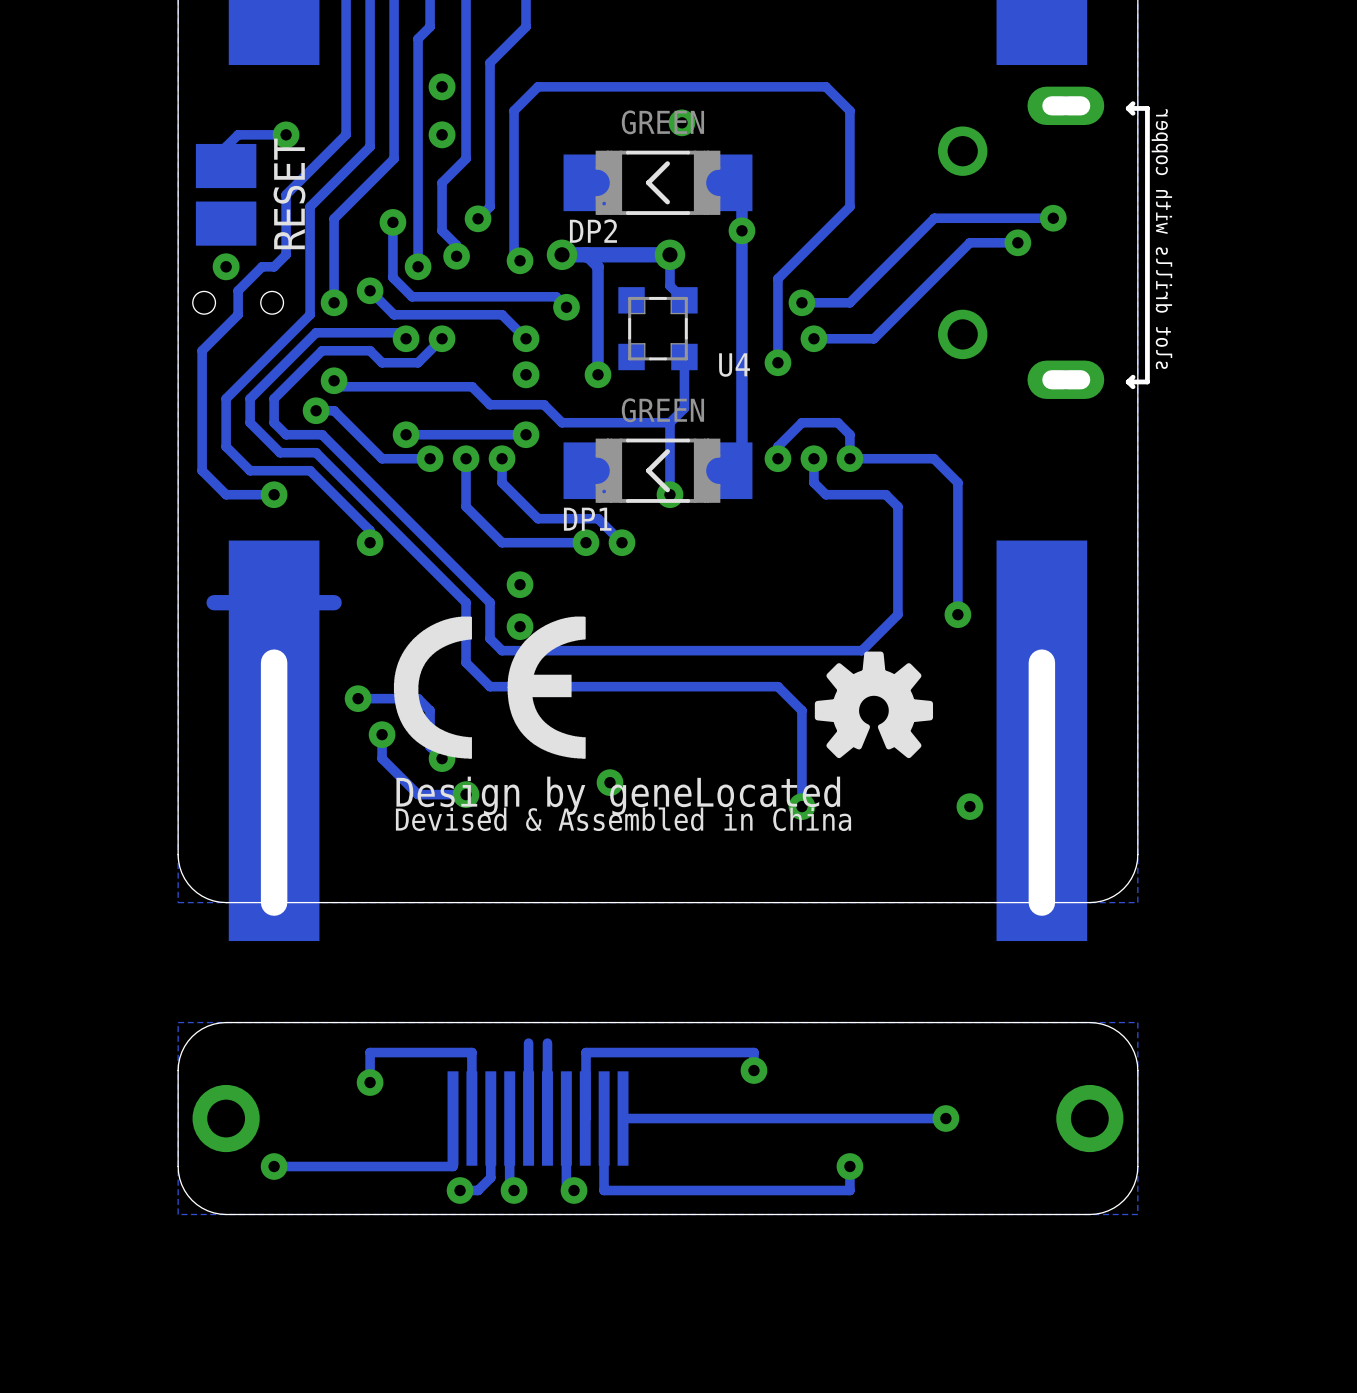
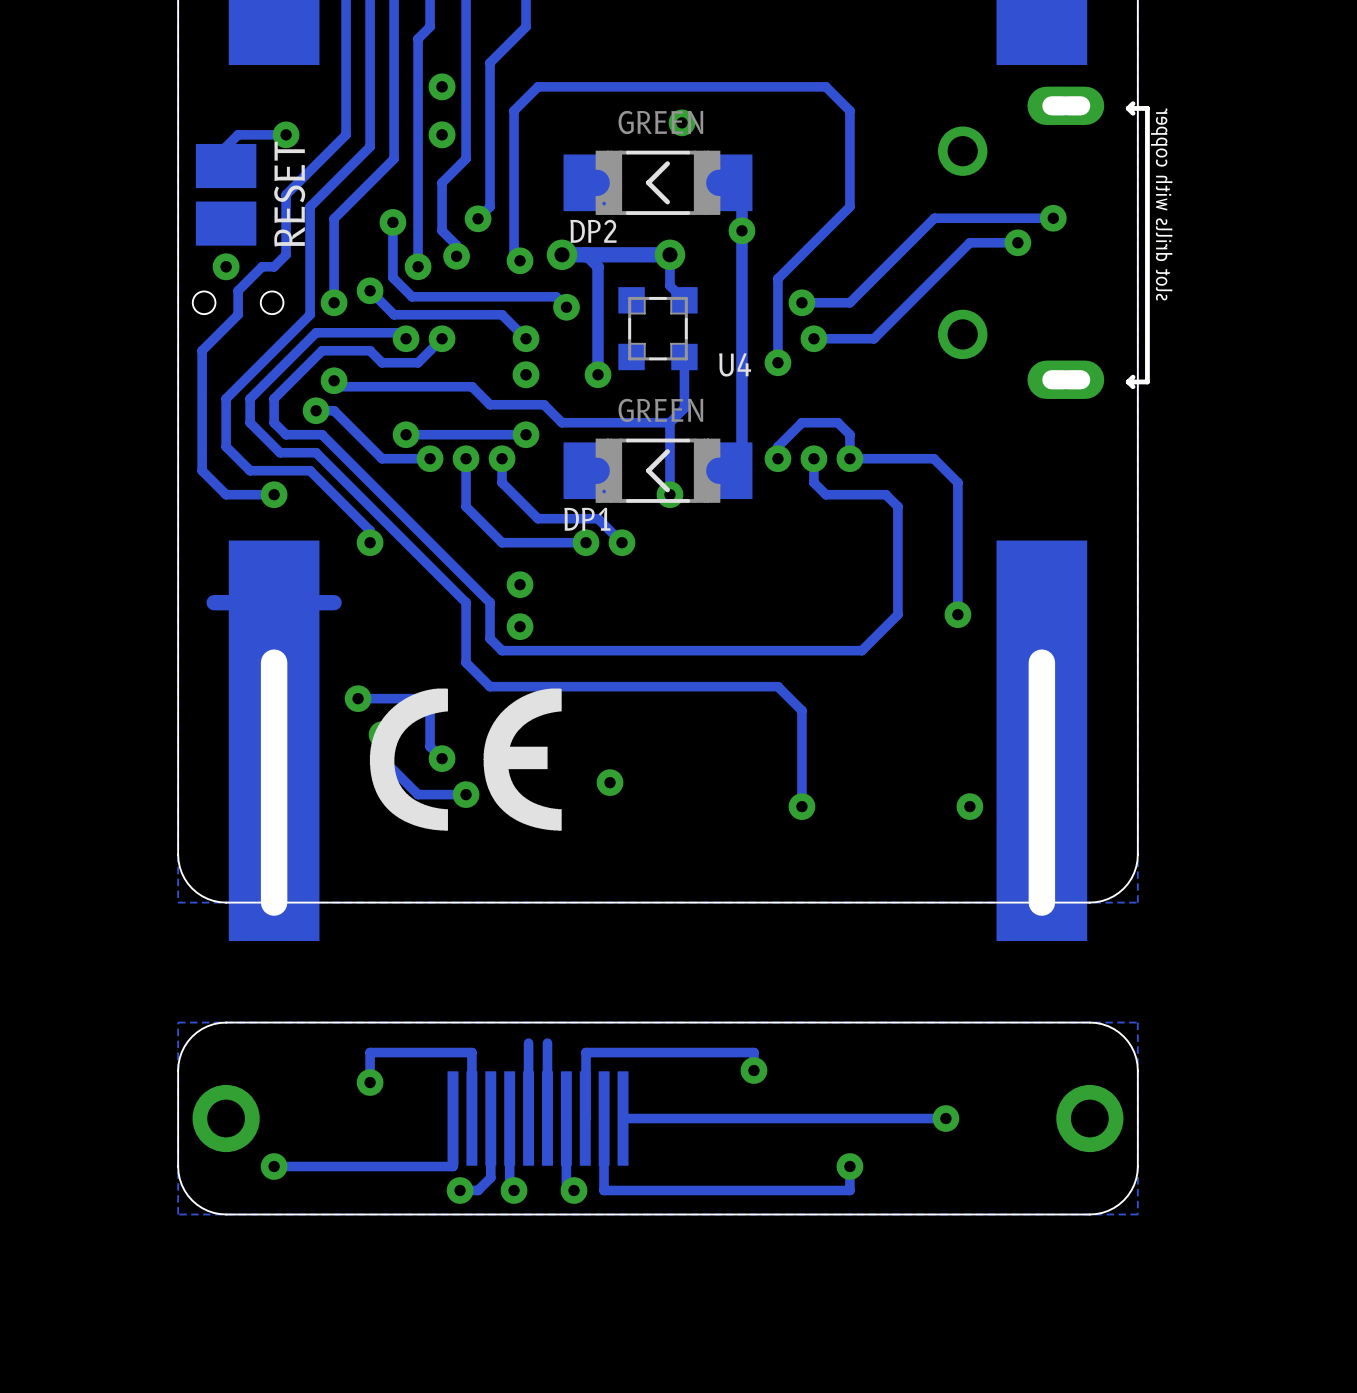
drawing: [814, 651, 934, 759] -> none
drawing position: (489, 687) -> (465, 759)
text: Design by geneLocated (618, 795) -> none
text: Devised & Assembled in China (623, 819) -> none

